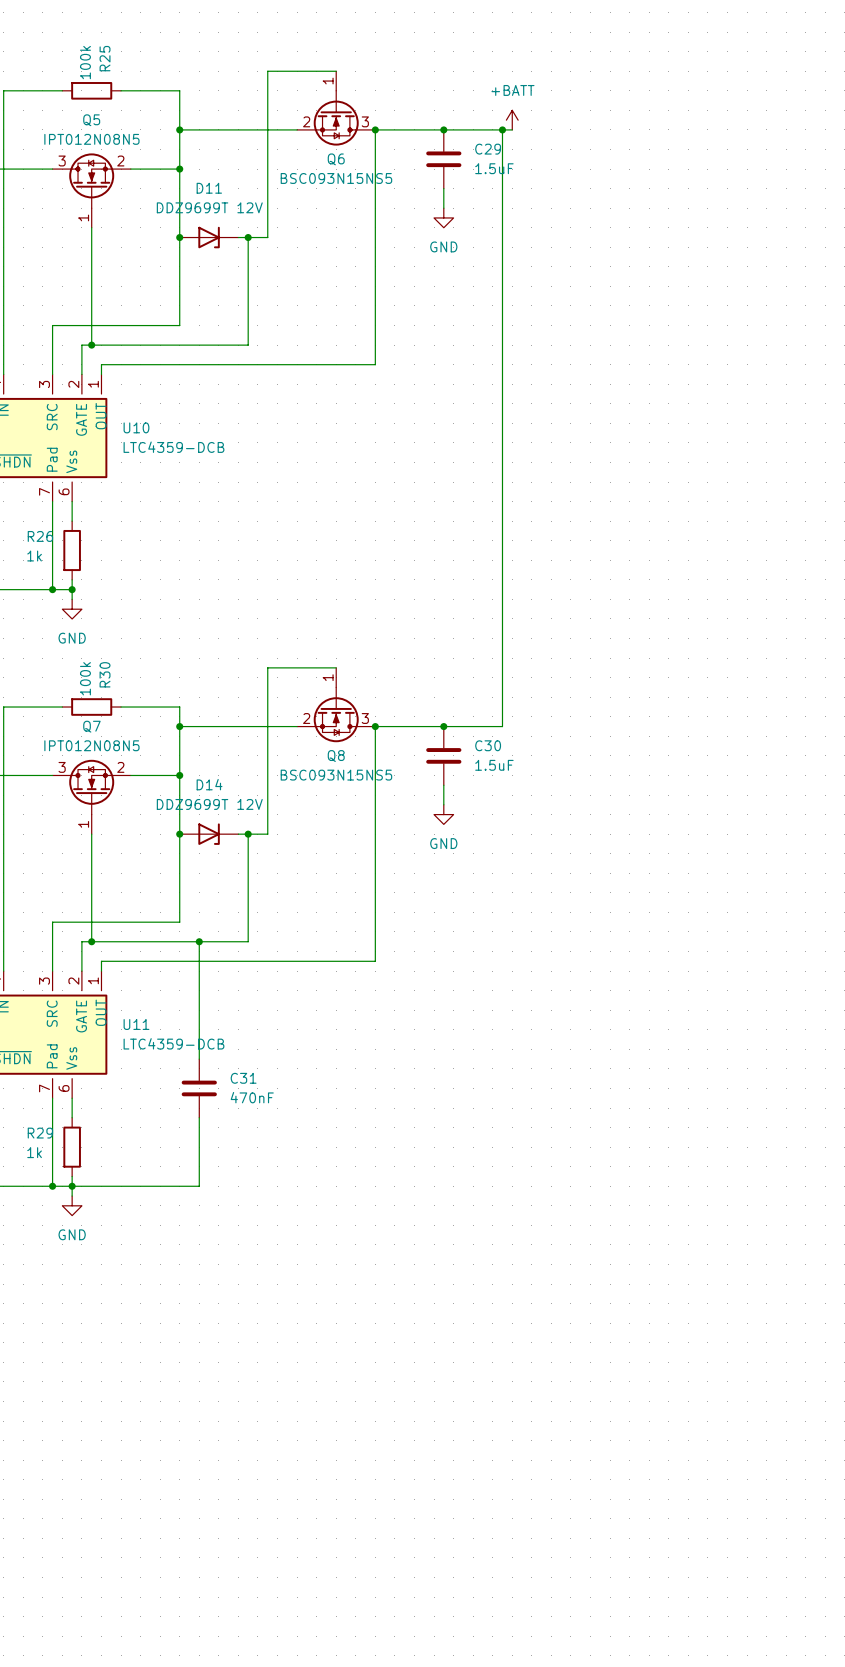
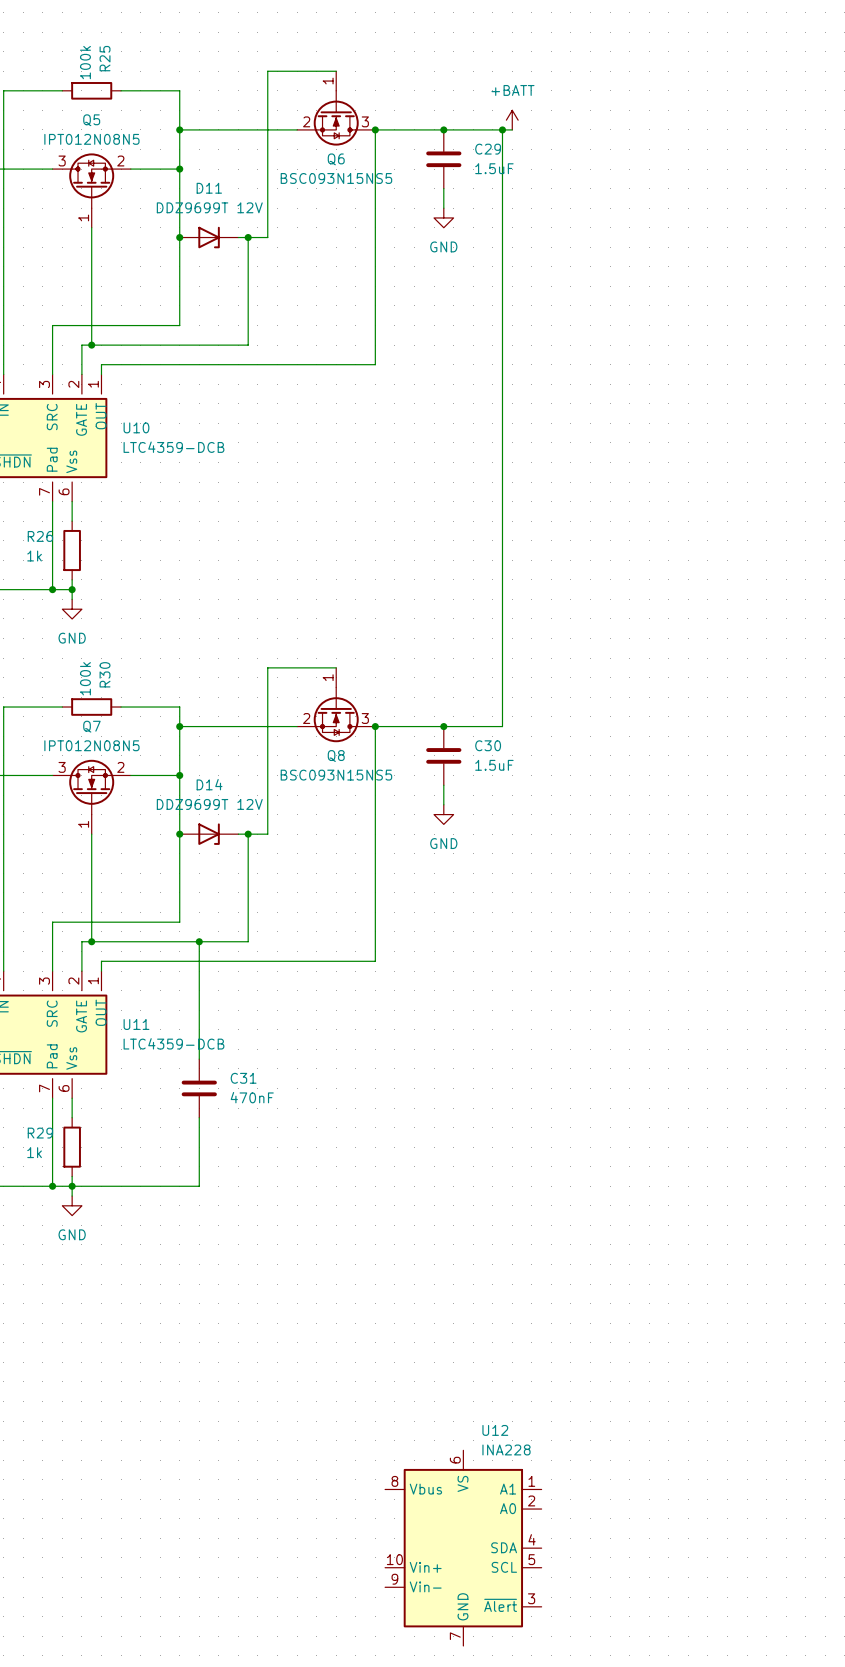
U12: none -> INA228 (463, 1548)

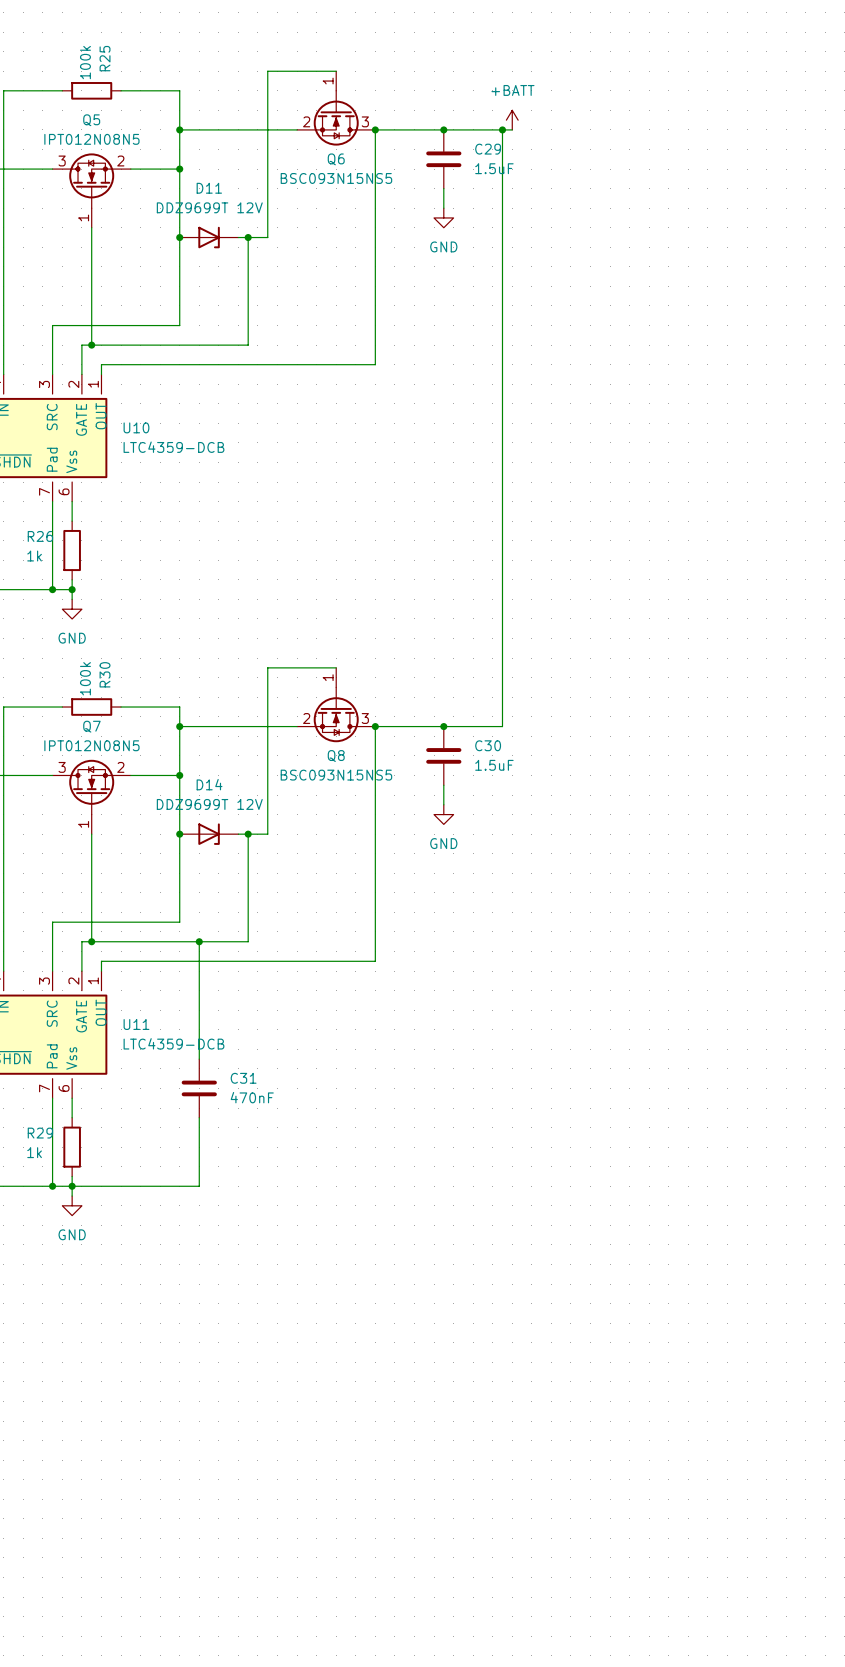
U12: INA228 (463, 1548) -> none

